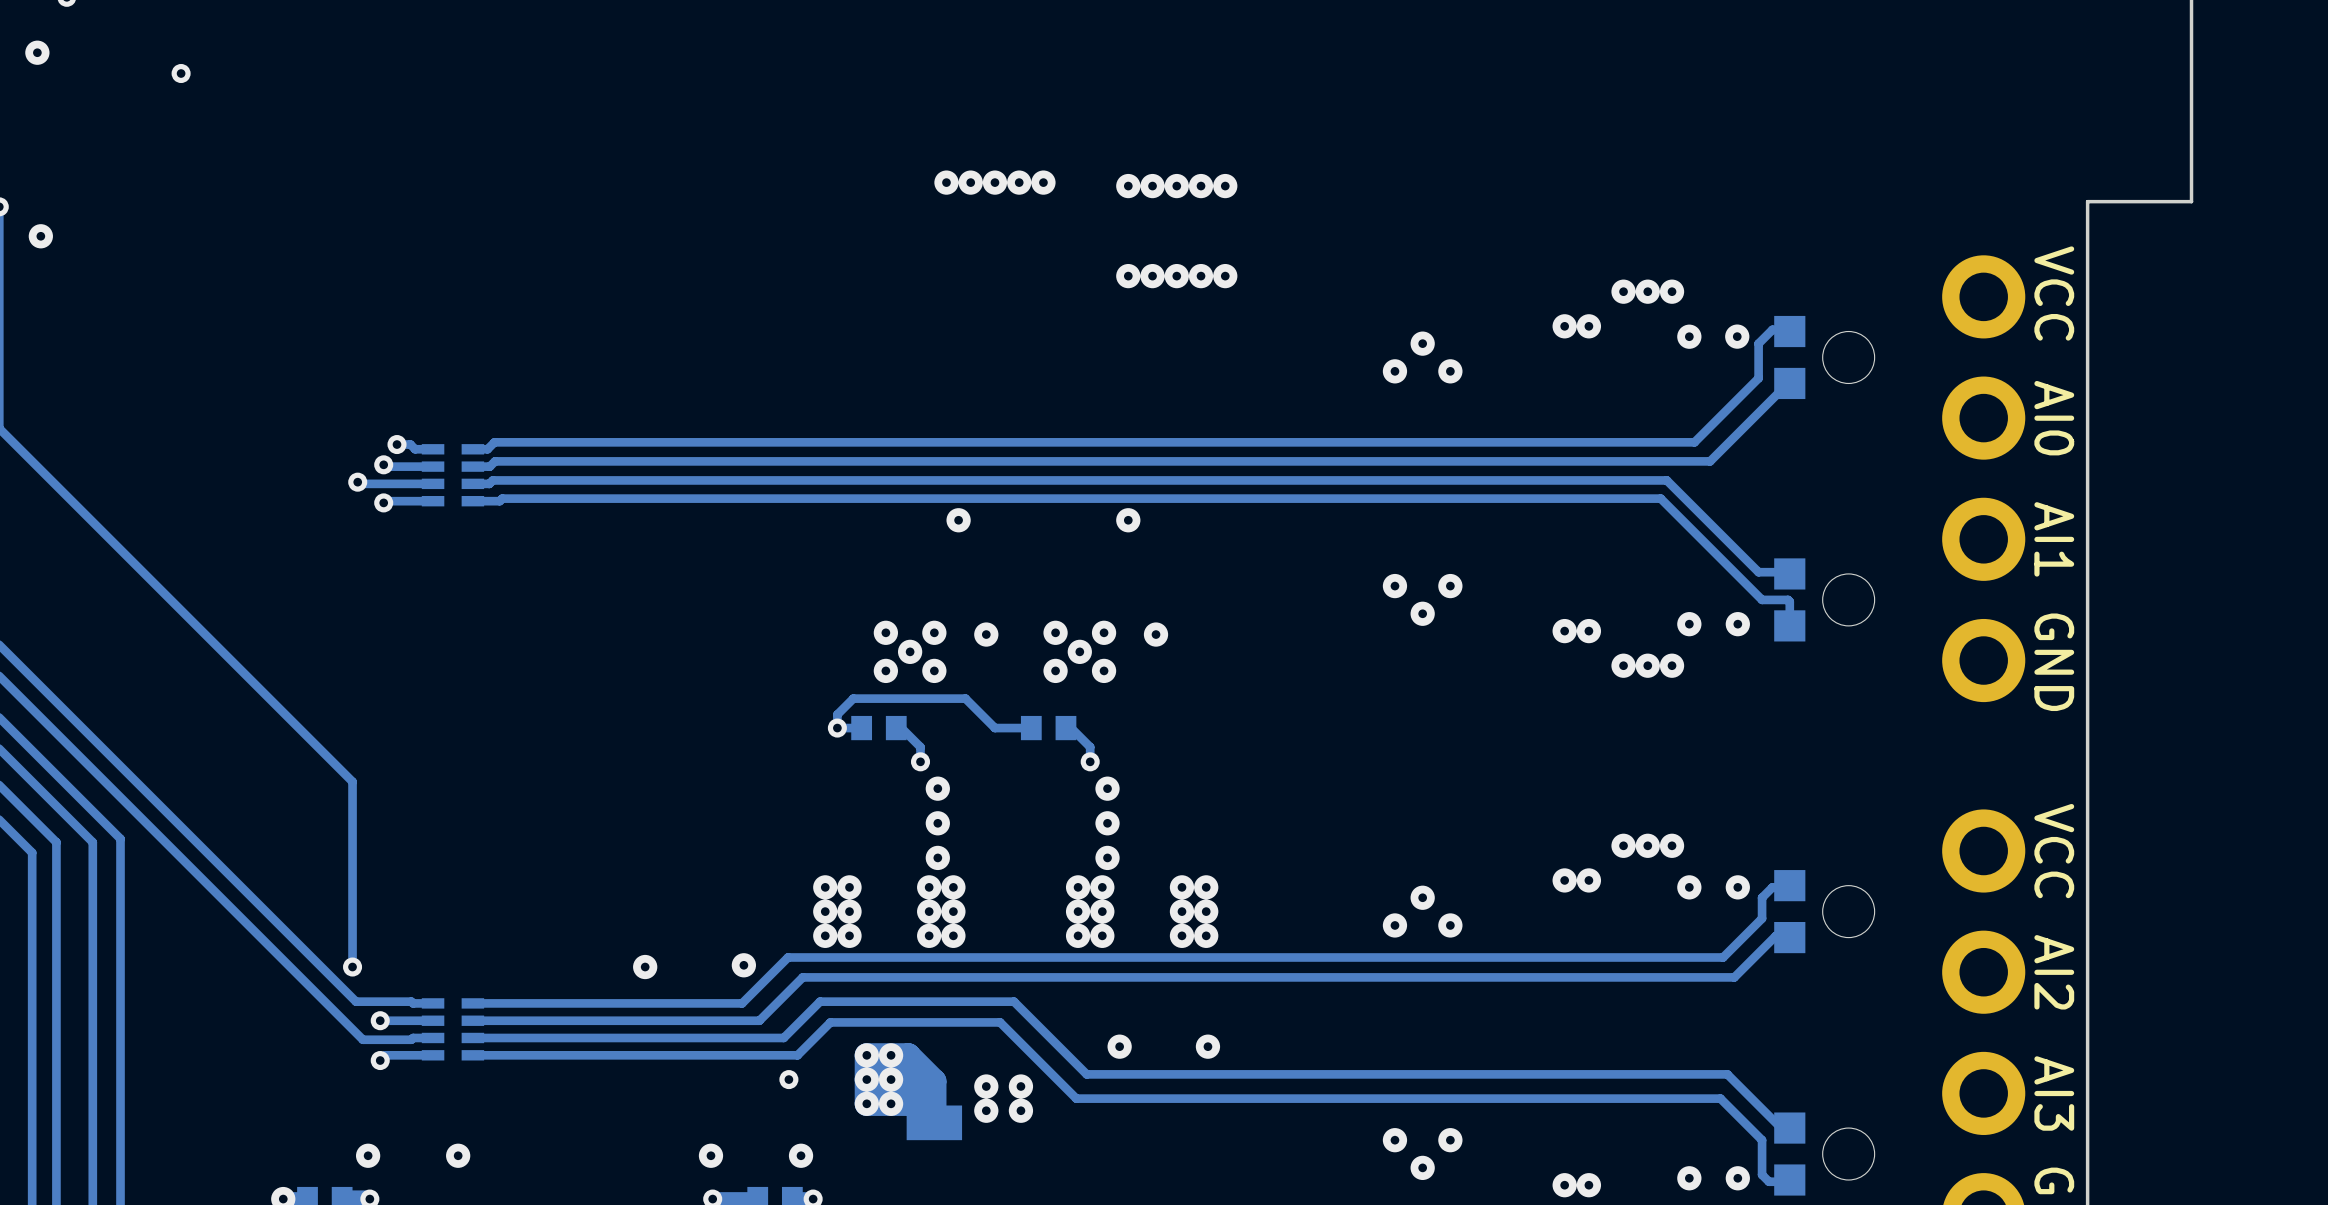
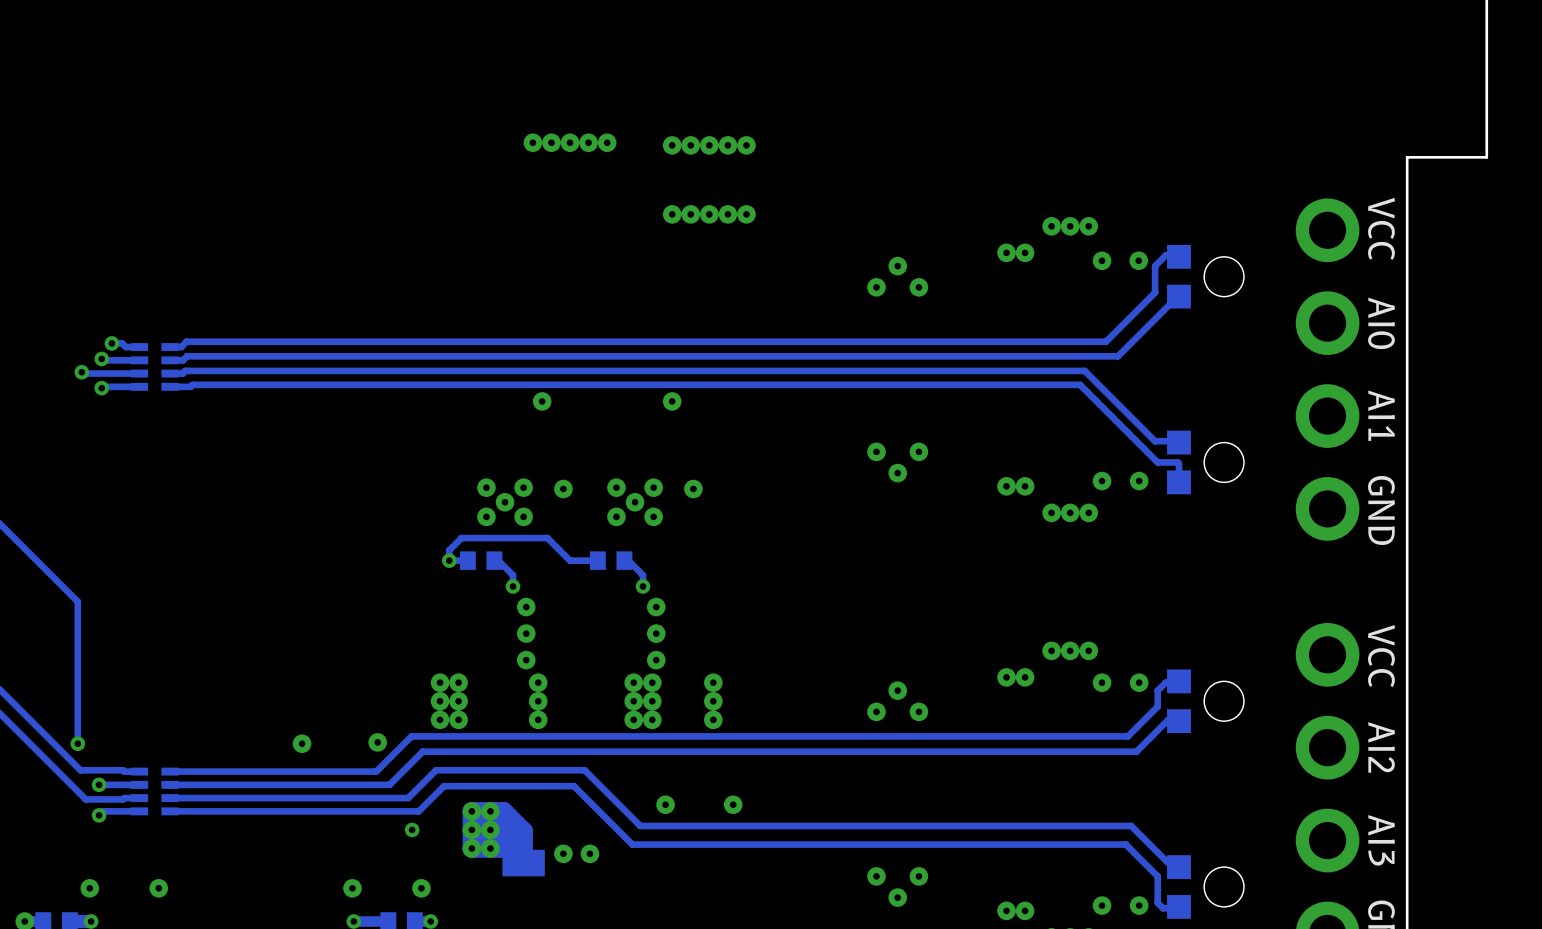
via: (929, 887) -> none
via: (1206, 887) -> none
via: (929, 911) -> none
via: (1206, 911) -> none
via: (929, 935) -> none
via: (1206, 935) -> none
via: (986, 1086) -> none
via: (1020, 1086) -> none

